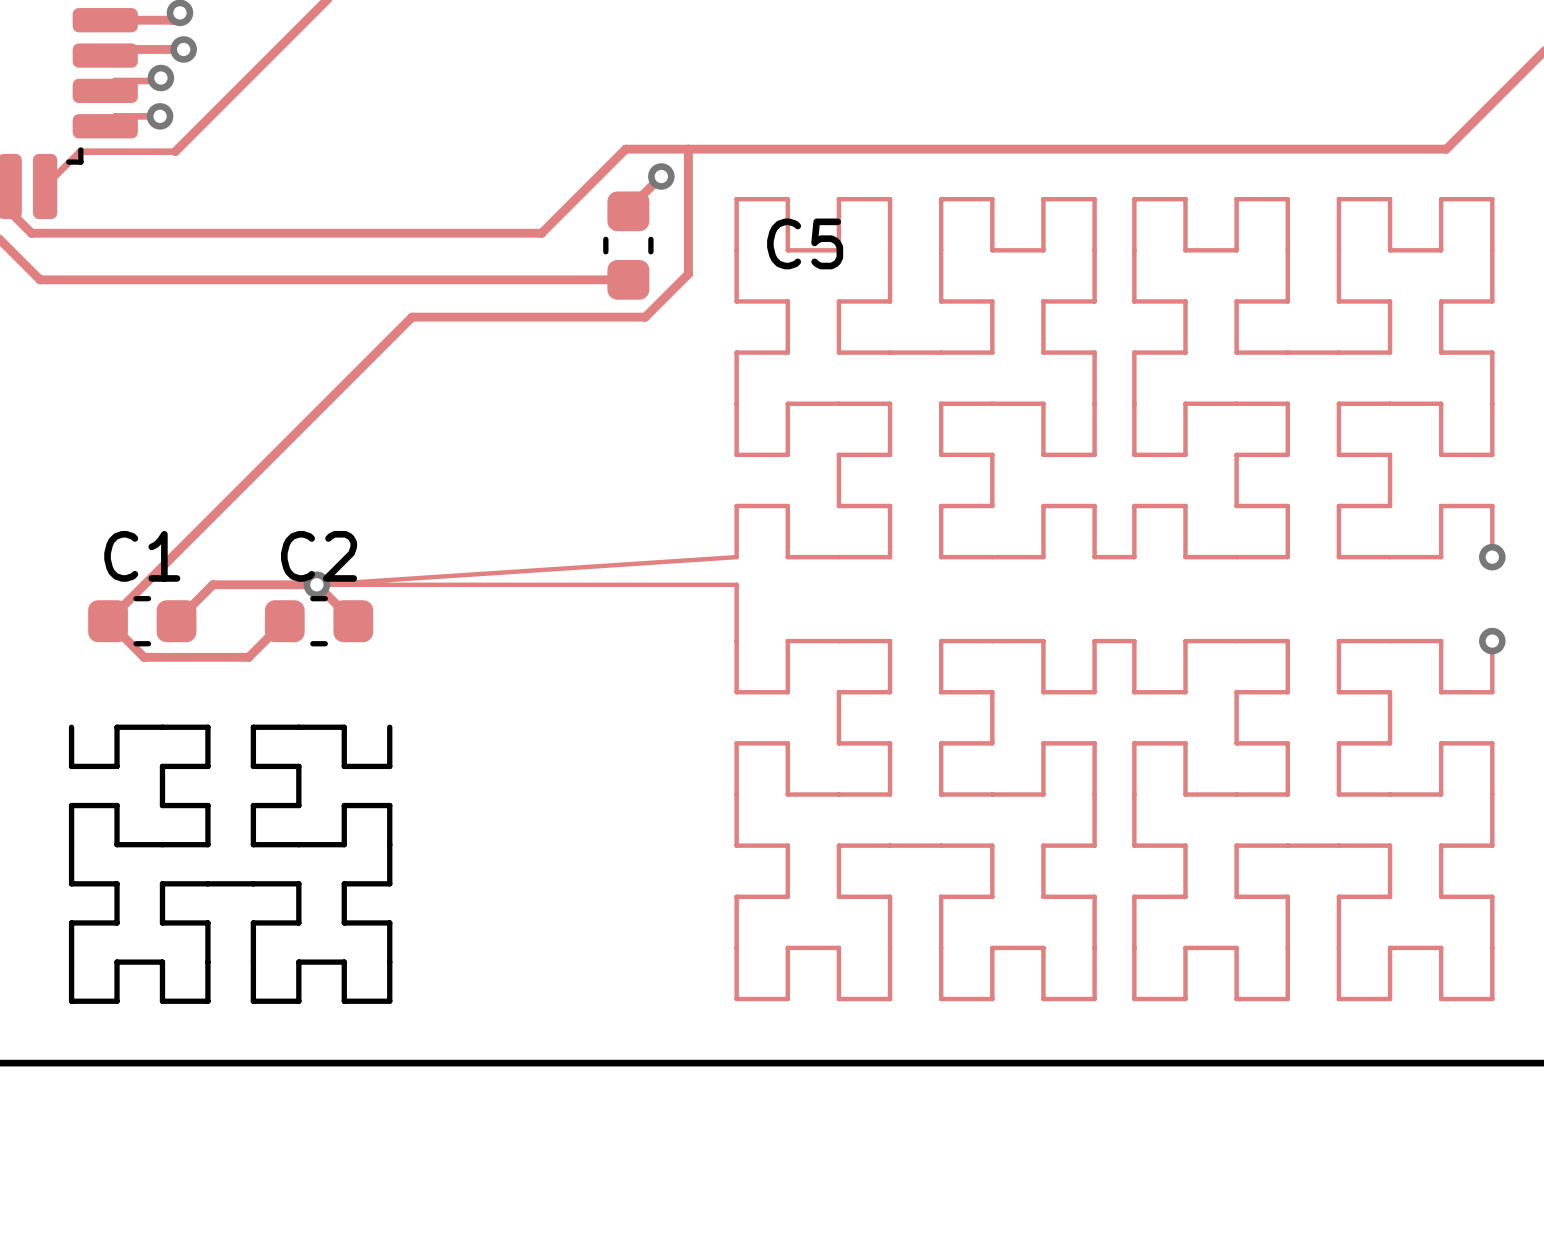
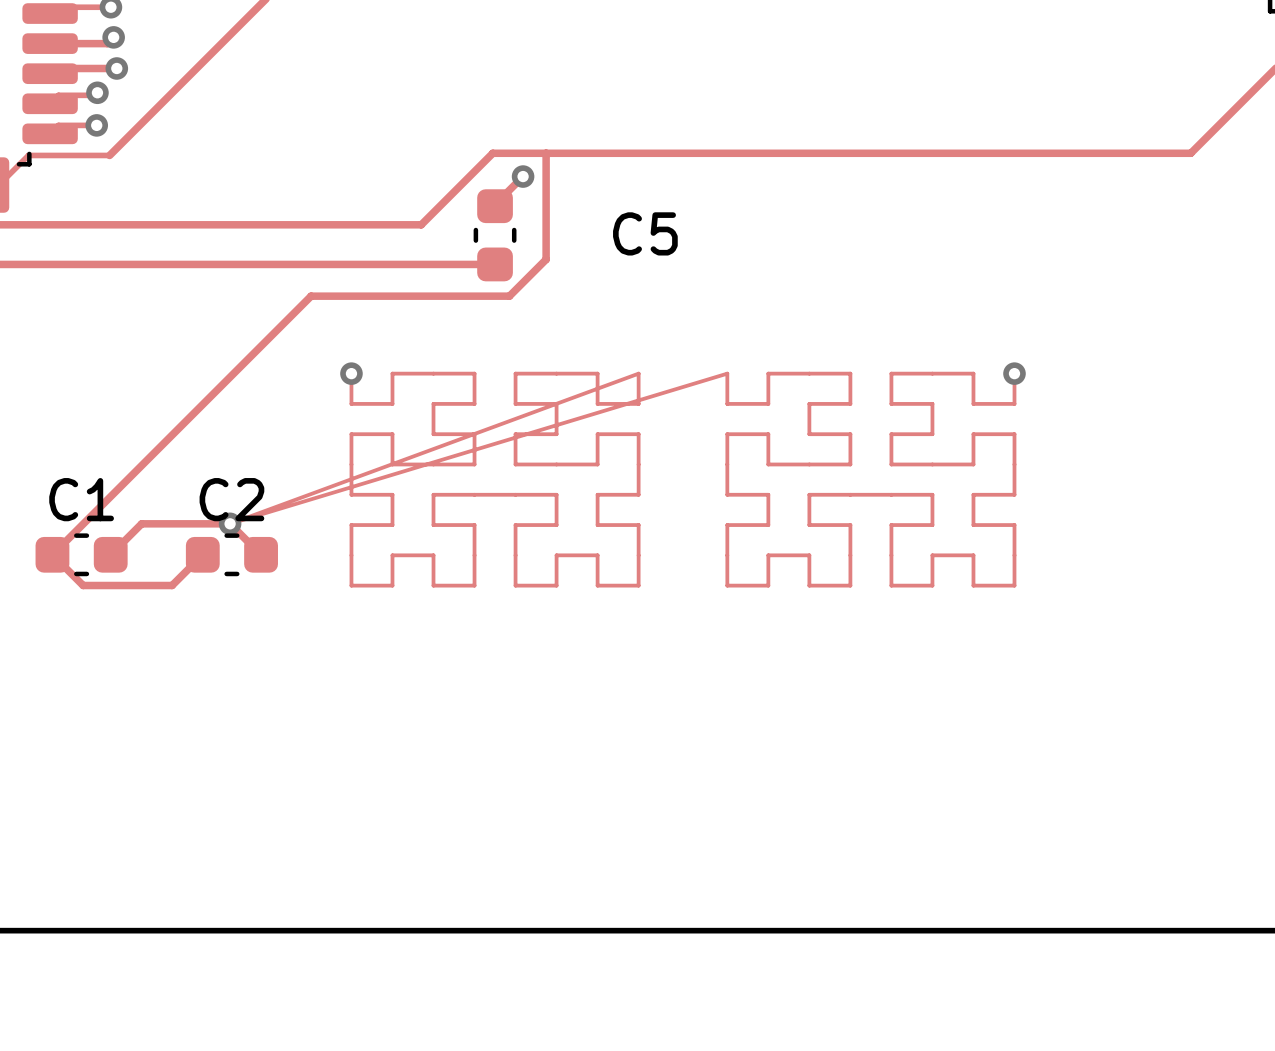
via: none -> (351, 373)
track: (1094, 408) (1094, 352) (1043, 352) (1043, 301) (1094, 301) (1094, 199) (1043, 199) (1043, 250) (992, 250) (992, 199) (941, 199) (941, 301) (992, 301) (992, 352) (838, 352) (838, 301) (890, 301) (890, 199) (838, 199) (838, 250) (787, 250) (787, 199) (736, 199) (736, 301) (787, 301) (787, 352) (736, 352) (736, 454) (787, 454) (787, 403) (890, 403) (890, 454) (838, 454) (838, 505) (890, 505) (890, 557) (787, 557) (787, 505) (736, 505) (736, 557) (316, 584) (736, 584) (736, 692) (787, 692) (787, 641) (890, 641) (890, 692) (838, 692) (838, 743) (890, 743) (890, 794) (787, 794) (787, 743) (736, 743) (736, 845) (787, 845) (787, 896) (736, 896) (736, 999) (787, 999) (787, 947) (838, 947) (838, 999) (890, 999) (890, 896) (838, 896) (838, 845) (992, 845) (992, 896) (941, 896) (941, 999) (992, 999) (992, 947) (1043, 947) (1043, 999) (1094, 999) (1094, 896) (1043, 896) (1043, 845) (1094, 845) (1094, 743) (1043, 743) (1043, 794) (941, 794) (941, 743) (992, 743) (992, 692) (941, 692) (941, 641) (1043, 641) (1043, 692) (1094, 692) (1094, 657) -> (891, 464) (973, 464) (973, 434) (1014, 434) (1014, 494) (973, 494) (973, 525) (1014, 525) (1014, 585) (973, 585) (973, 555) (932, 555) (932, 585) (891, 585)
track: none -> (891, 373) (973, 373) (973, 403) (1014, 403) (1014, 373)
via: none -> (1014, 373)
track: (1094, 443) (1094, 454) (1043, 454) (1043, 403) (941, 403) (941, 454) (992, 454) (992, 505) (941, 505) (941, 557) (1043, 557) (1043, 505) (1094, 505) -> (891, 403) (932, 403) (932, 434) (891, 434) (891, 456)
track: (1094, 515) (1094, 557) (1134, 557) (1134, 505) (1185, 505) (1185, 557) (1287, 557) (1287, 505) (1236, 505) (1236, 454) (1287, 454) (1287, 403) (1185, 403) (1185, 454) (1134, 454) (1134, 352) (1185, 352) (1185, 301) (1134, 301) (1134, 199) (1185, 199) (1185, 250) (1236, 250) (1236, 199) (1287, 199) (1287, 301) (1236, 301) (1236, 352) (1390, 352) (1390, 301) (1338, 301) (1338, 199) (1390, 199) (1390, 250) (1441, 250) (1441, 199) (1492, 199) (1492, 301) (1441, 301) (1441, 352) (1492, 352) (1492, 454) (1441, 454) (1441, 403) (1338, 403) (1338, 454) (1390, 454) (1390, 505) (1338, 505) (1338, 557) (1441, 557) (1441, 505) (1492, 505) (1492, 557) -> none
via: (1492, 557) -> none
track: (1094, 641) (1134, 641) (1134, 692) (1185, 692) (1185, 641) (1287, 641) (1287, 692) (1236, 692) (1236, 743) (1287, 743) (1287, 794) (1185, 794) (1185, 743) (1134, 743) (1134, 845) (1185, 845) (1185, 896) (1134, 896) (1134, 999) (1185, 999) (1185, 947) (1236, 947) (1236, 999) (1287, 999) (1287, 896) (1236, 896) (1236, 845) (1390, 845) (1390, 896) (1338, 896) (1338, 999) (1390, 999) (1390, 947) (1441, 947) (1441, 999) (1492, 999) (1492, 896) (1441, 896) (1441, 845) (1492, 845) (1492, 743) (1441, 743) (1441, 794) (1338, 794) (1338, 743) (1390, 743) (1390, 692) (1338, 692) (1338, 641) (1441, 641) (1441, 692) (1492, 692) (1492, 641) -> (891, 571) (891, 525) (932, 525) (932, 494) (809, 494) (809, 525) (850, 525) (850, 585) (809, 585) (809, 555) (768, 555) (768, 585) (727, 585) (727, 525) (768, 525) (768, 494) (727, 494) (727, 434) (768, 434) (768, 464) (850, 464) (850, 434) (809, 434) (809, 403) (850, 403) (850, 373) (768, 373) (768, 403) (727, 403) (727, 373) (230, 523) (638, 373) (638, 403) (597, 403) (597, 373) (515, 373) (515, 403) (556, 403) (556, 434) (515, 434) (515, 464) (597, 464) (597, 434) (638, 434) (638, 494) (597, 494) (597, 525) (638, 525) (638, 585) (597, 585) (597, 555) (556, 555) (556, 585) (515, 585) (515, 525) (556, 525) (556, 494) (433, 494) (433, 525) (474, 525) (474, 585) (433, 585) (433, 555) (392, 555) (392, 585) (351, 585) (351, 525) (392, 525) (392, 494) (351, 494) (351, 434) (392, 434) (392, 464) (474, 464) (474, 434) (433, 434) (433, 403) (474, 403) (474, 373) (392, 373) (392, 403) (351, 403) (351, 373)
via: (1492, 641) -> none
line: (71, 727) (71, 766) (117, 766) (117, 727) (207, 727) (207, 766) (162, 766) (162, 805) (207, 805) (207, 844) (117, 844) (117, 805) (71, 805) (71, 883) (117, 883) (117, 922) (71, 922) (71, 1001) (117, 1001) (117, 962) (162, 962) (162, 1001) (207, 1001) (207, 922) (162, 922) (162, 883) (298, 883) (298, 922) (253, 922) (253, 1001) (298, 1001) (298, 962) (344, 962) (344, 1001) (389, 1001) (389, 922) (344, 922) (344, 883) (389, 883) (389, 805) (344, 805) (344, 844) (253, 844) (253, 805) (298, 805) (298, 766) (253, 766) (253, 727) (344, 727) (344, 766) (389, 766) (389, 727) -> none

